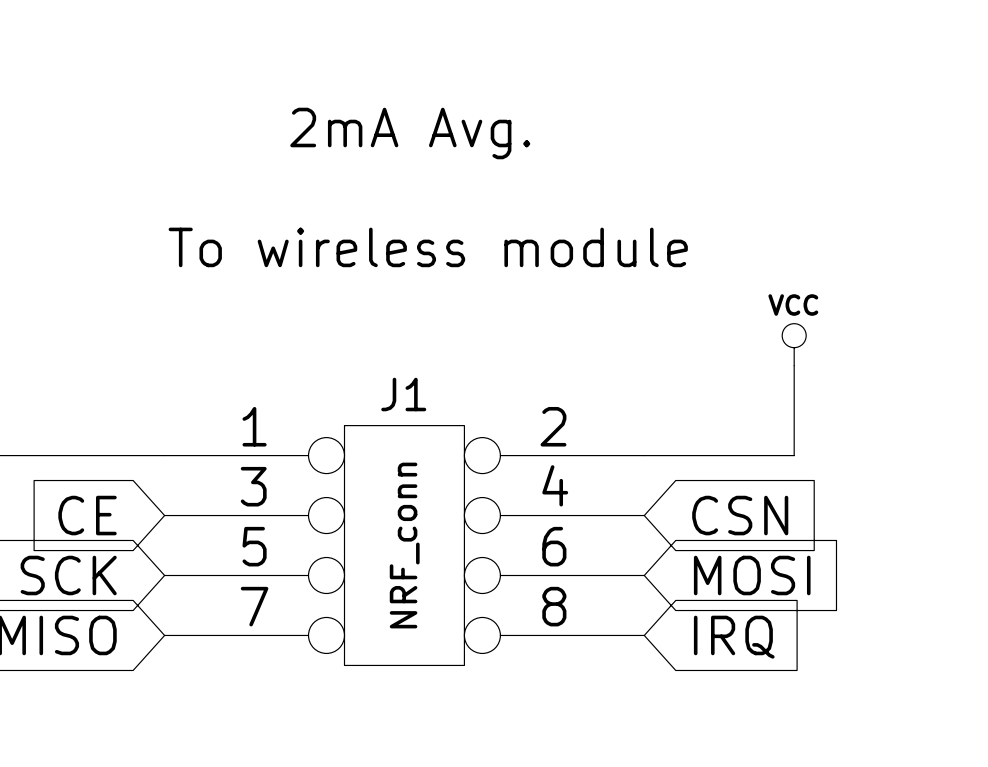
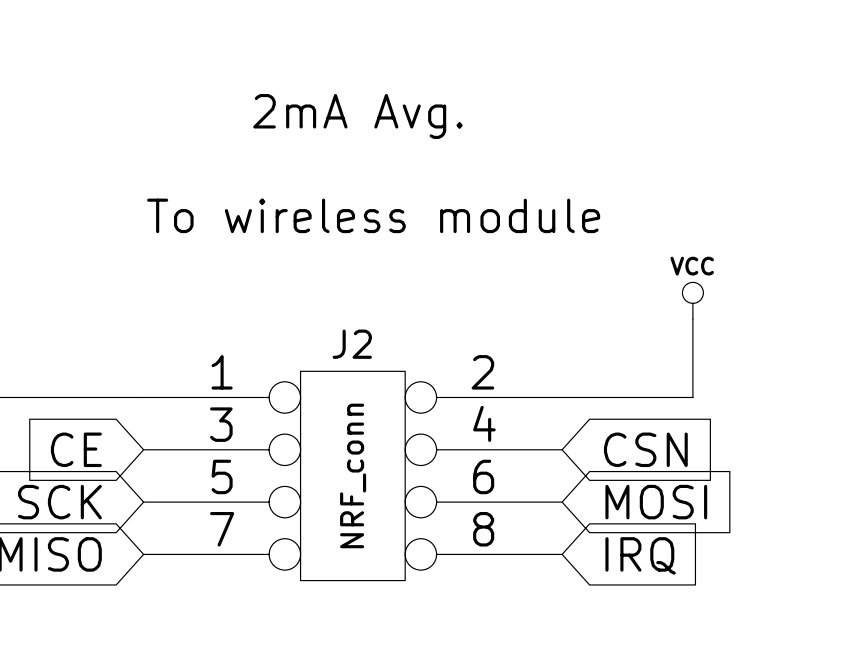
J1 name: J1 (403, 394) -> J2 (352, 344)

